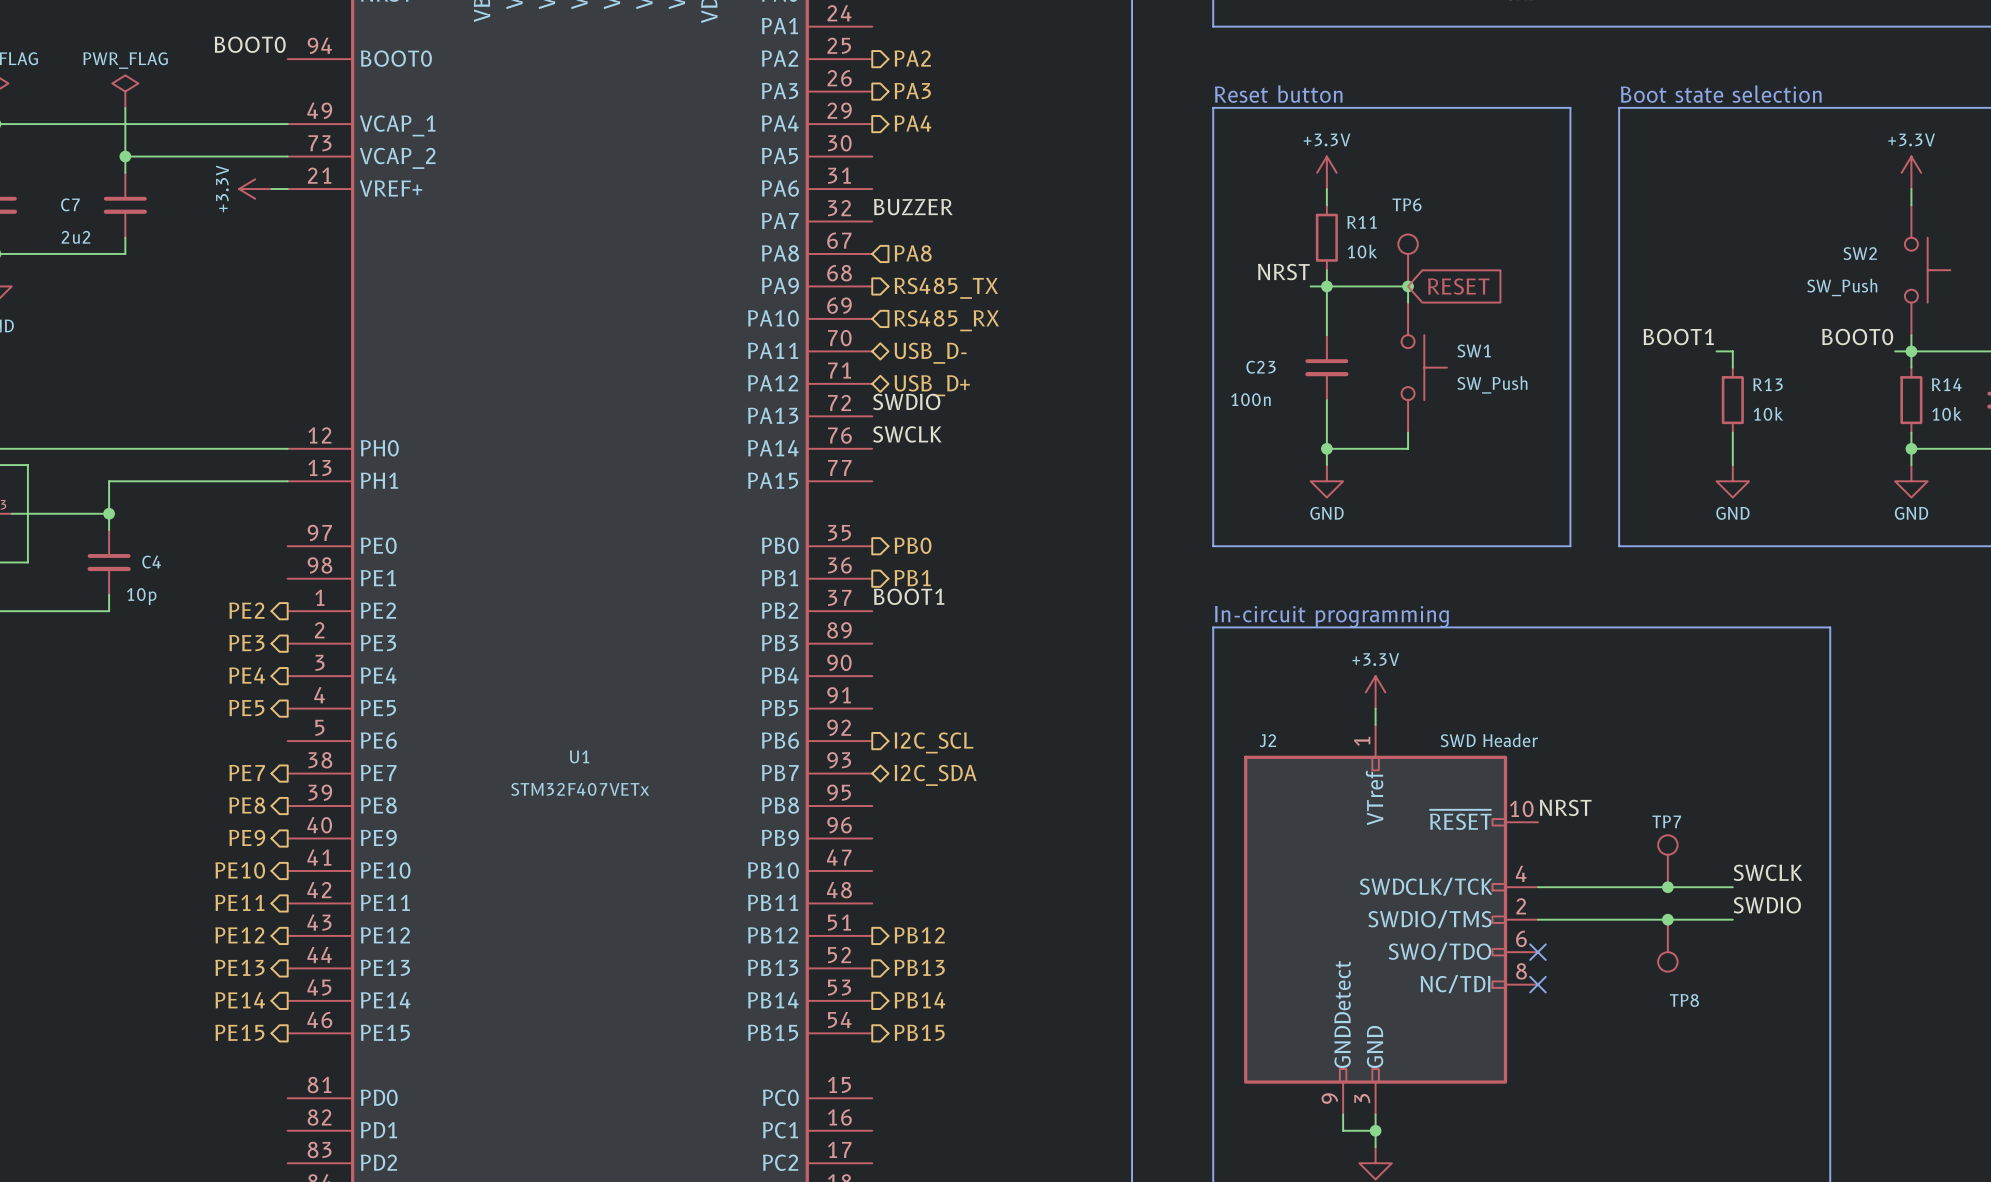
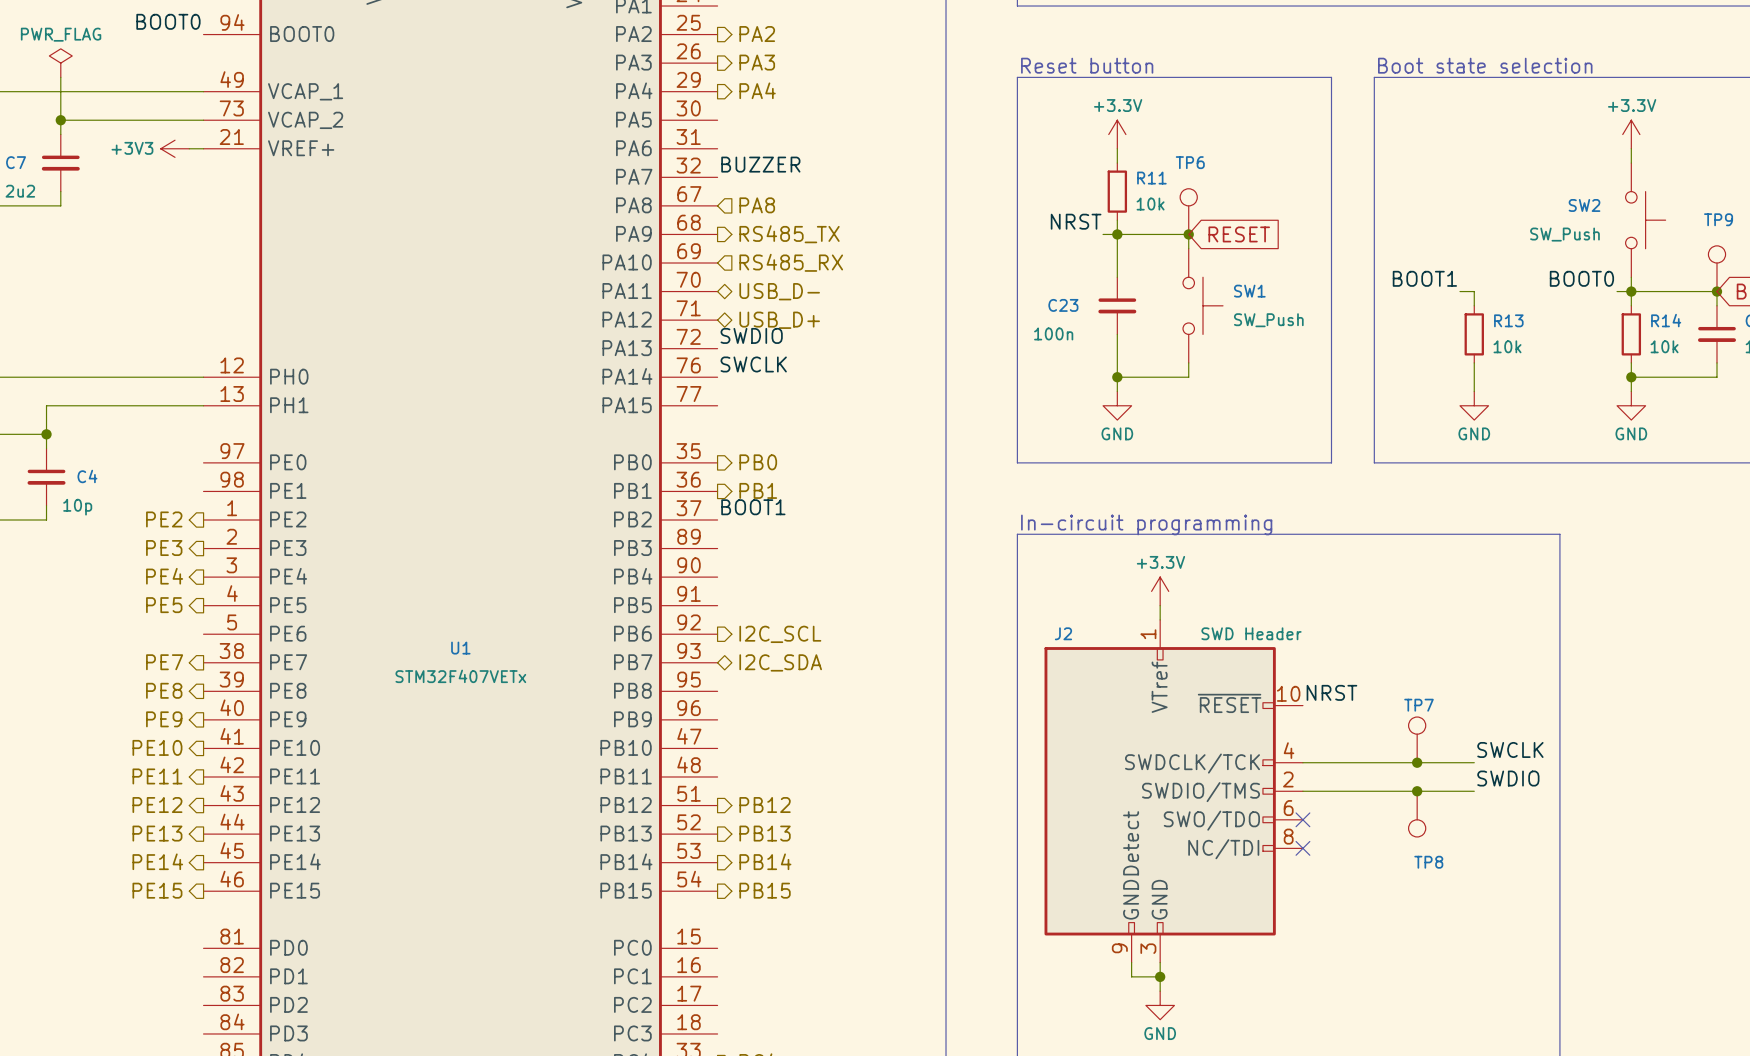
power symbol: +3.3V (255, 189) -> +3V3 (175, 148)

